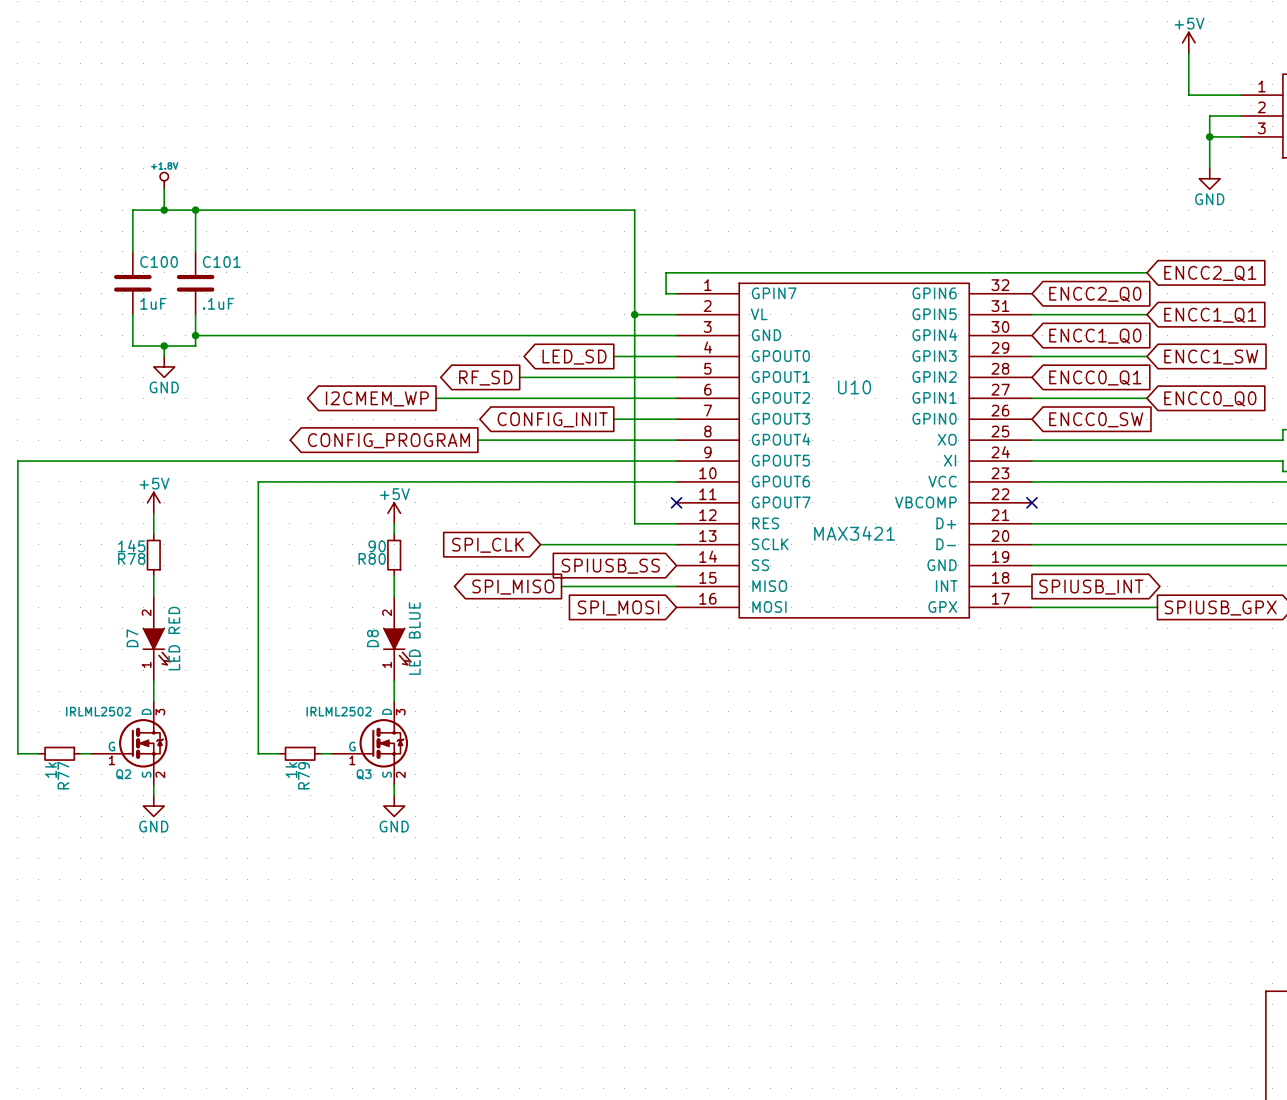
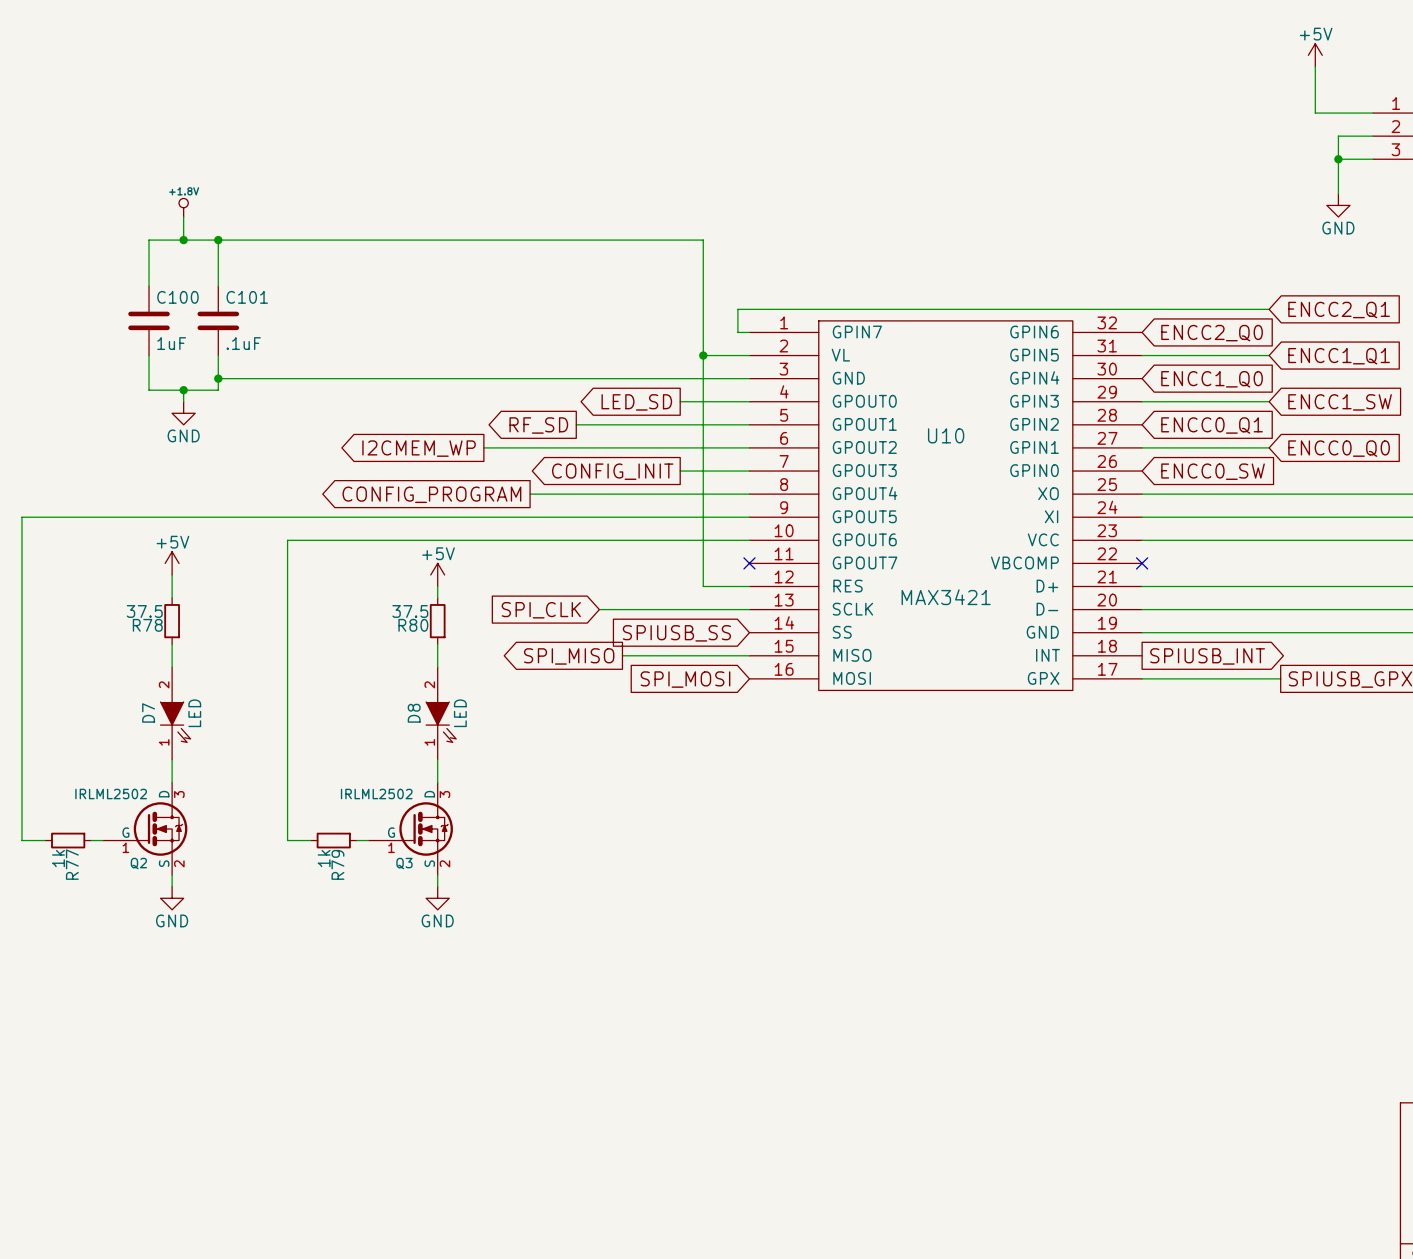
R78 value: 145 (131, 546) -> 37.5 (144, 611)
R80 value: 90 (377, 546) -> 37.5 (410, 611)
D7 value: LED RED (174, 638) -> LED (194, 713)
D8 value: LED BLUE (414, 638) -> LED (460, 713)

